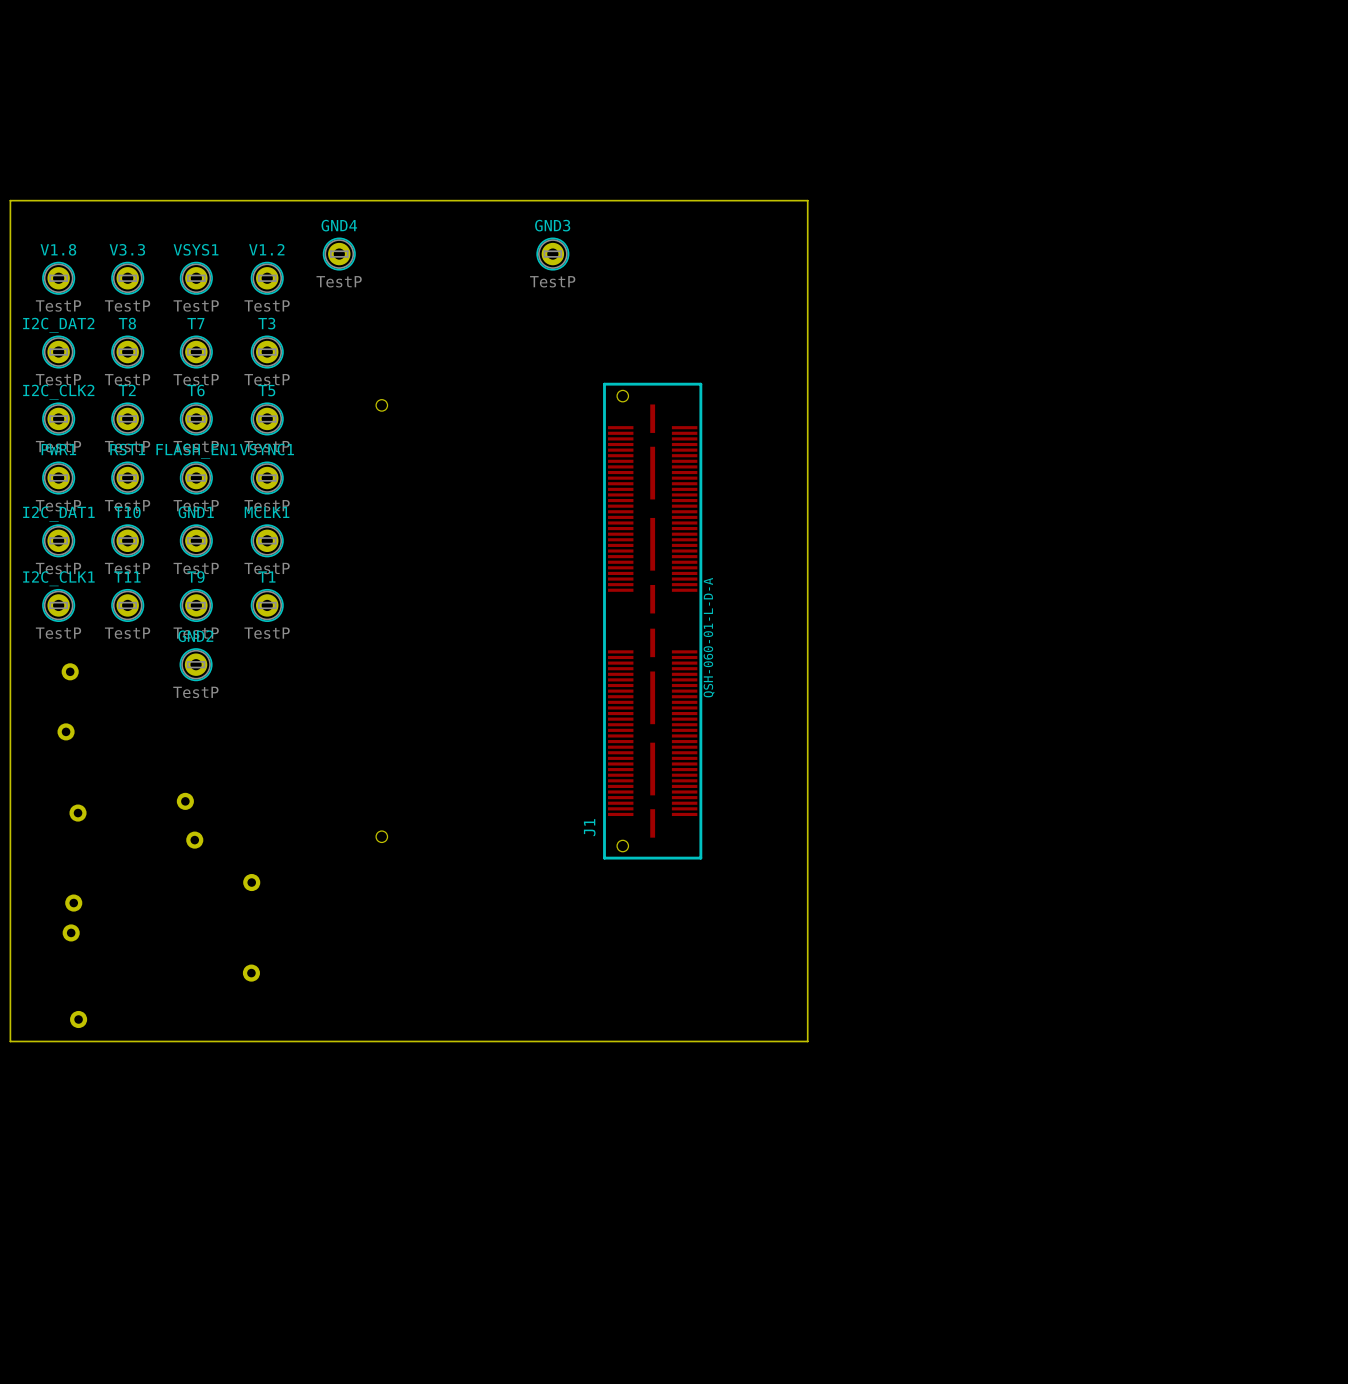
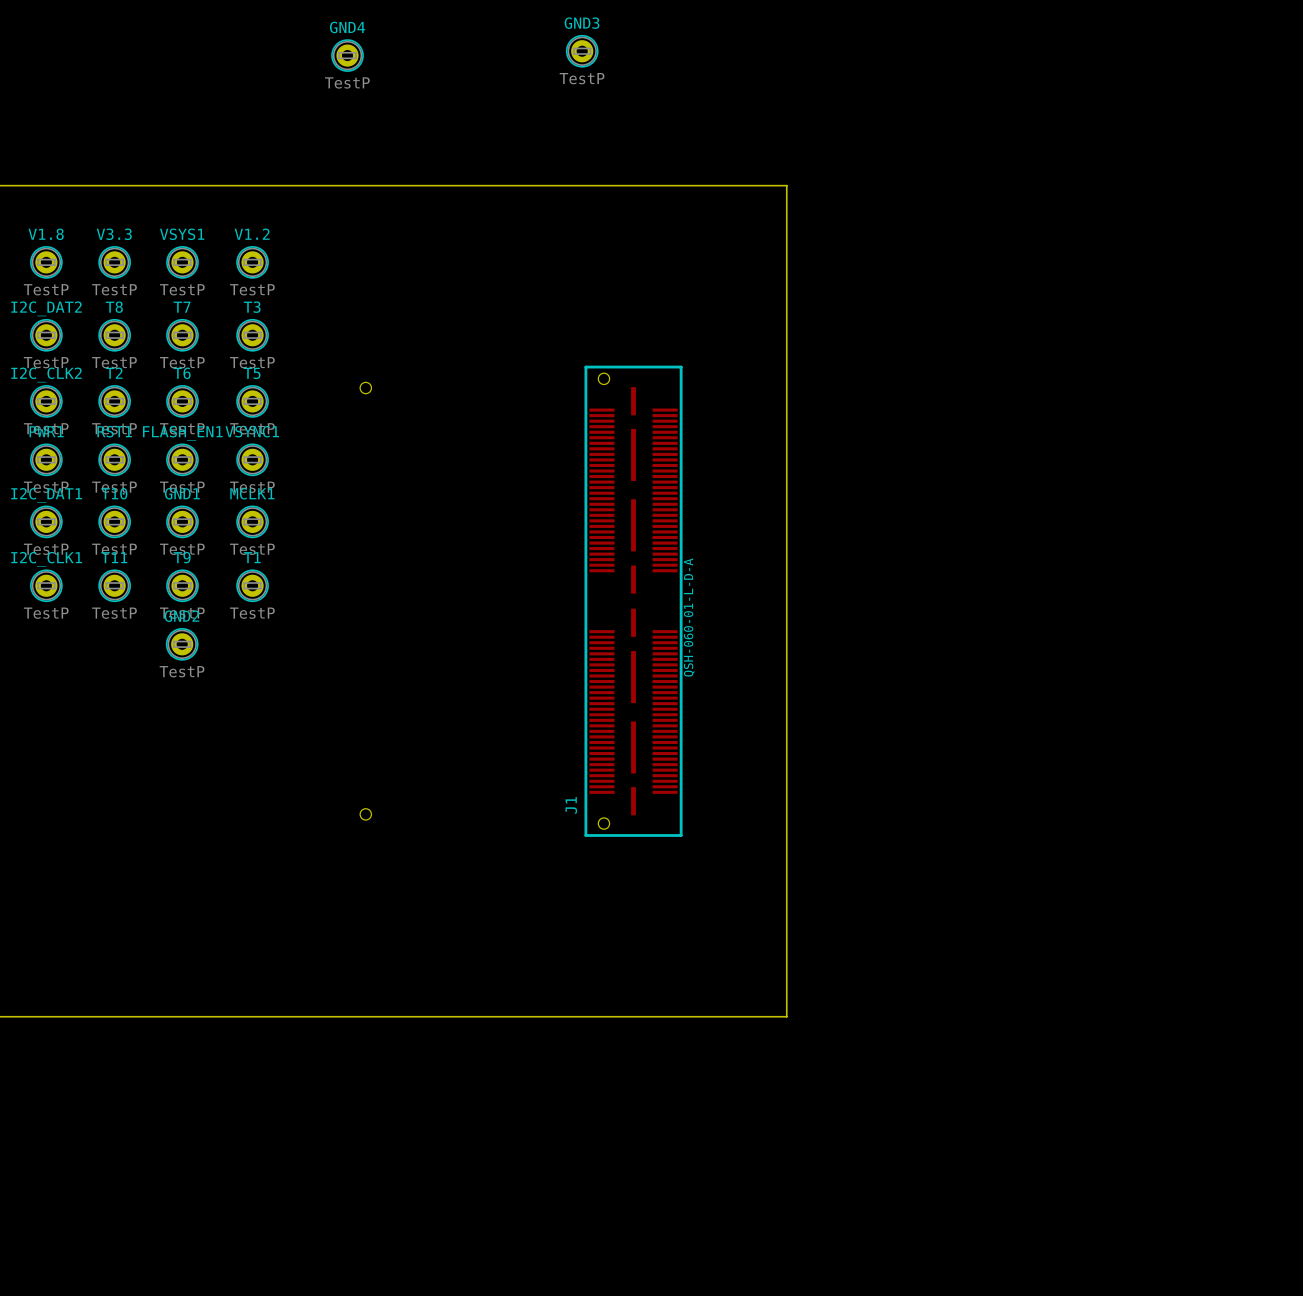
GND4 position: (339, 254) -> (347, 55)
GND3 position: (552, 254) -> (582, 51)
part: (70, 671) -> none
part: (66, 731) -> none
part: (185, 801) -> none
part: (78, 813) -> none
part: (194, 840) -> none
part: (251, 882) -> none
part: (73, 903) -> none
part: (71, 932) -> none
part: (251, 973) -> none
part: (78, 1019) -> none

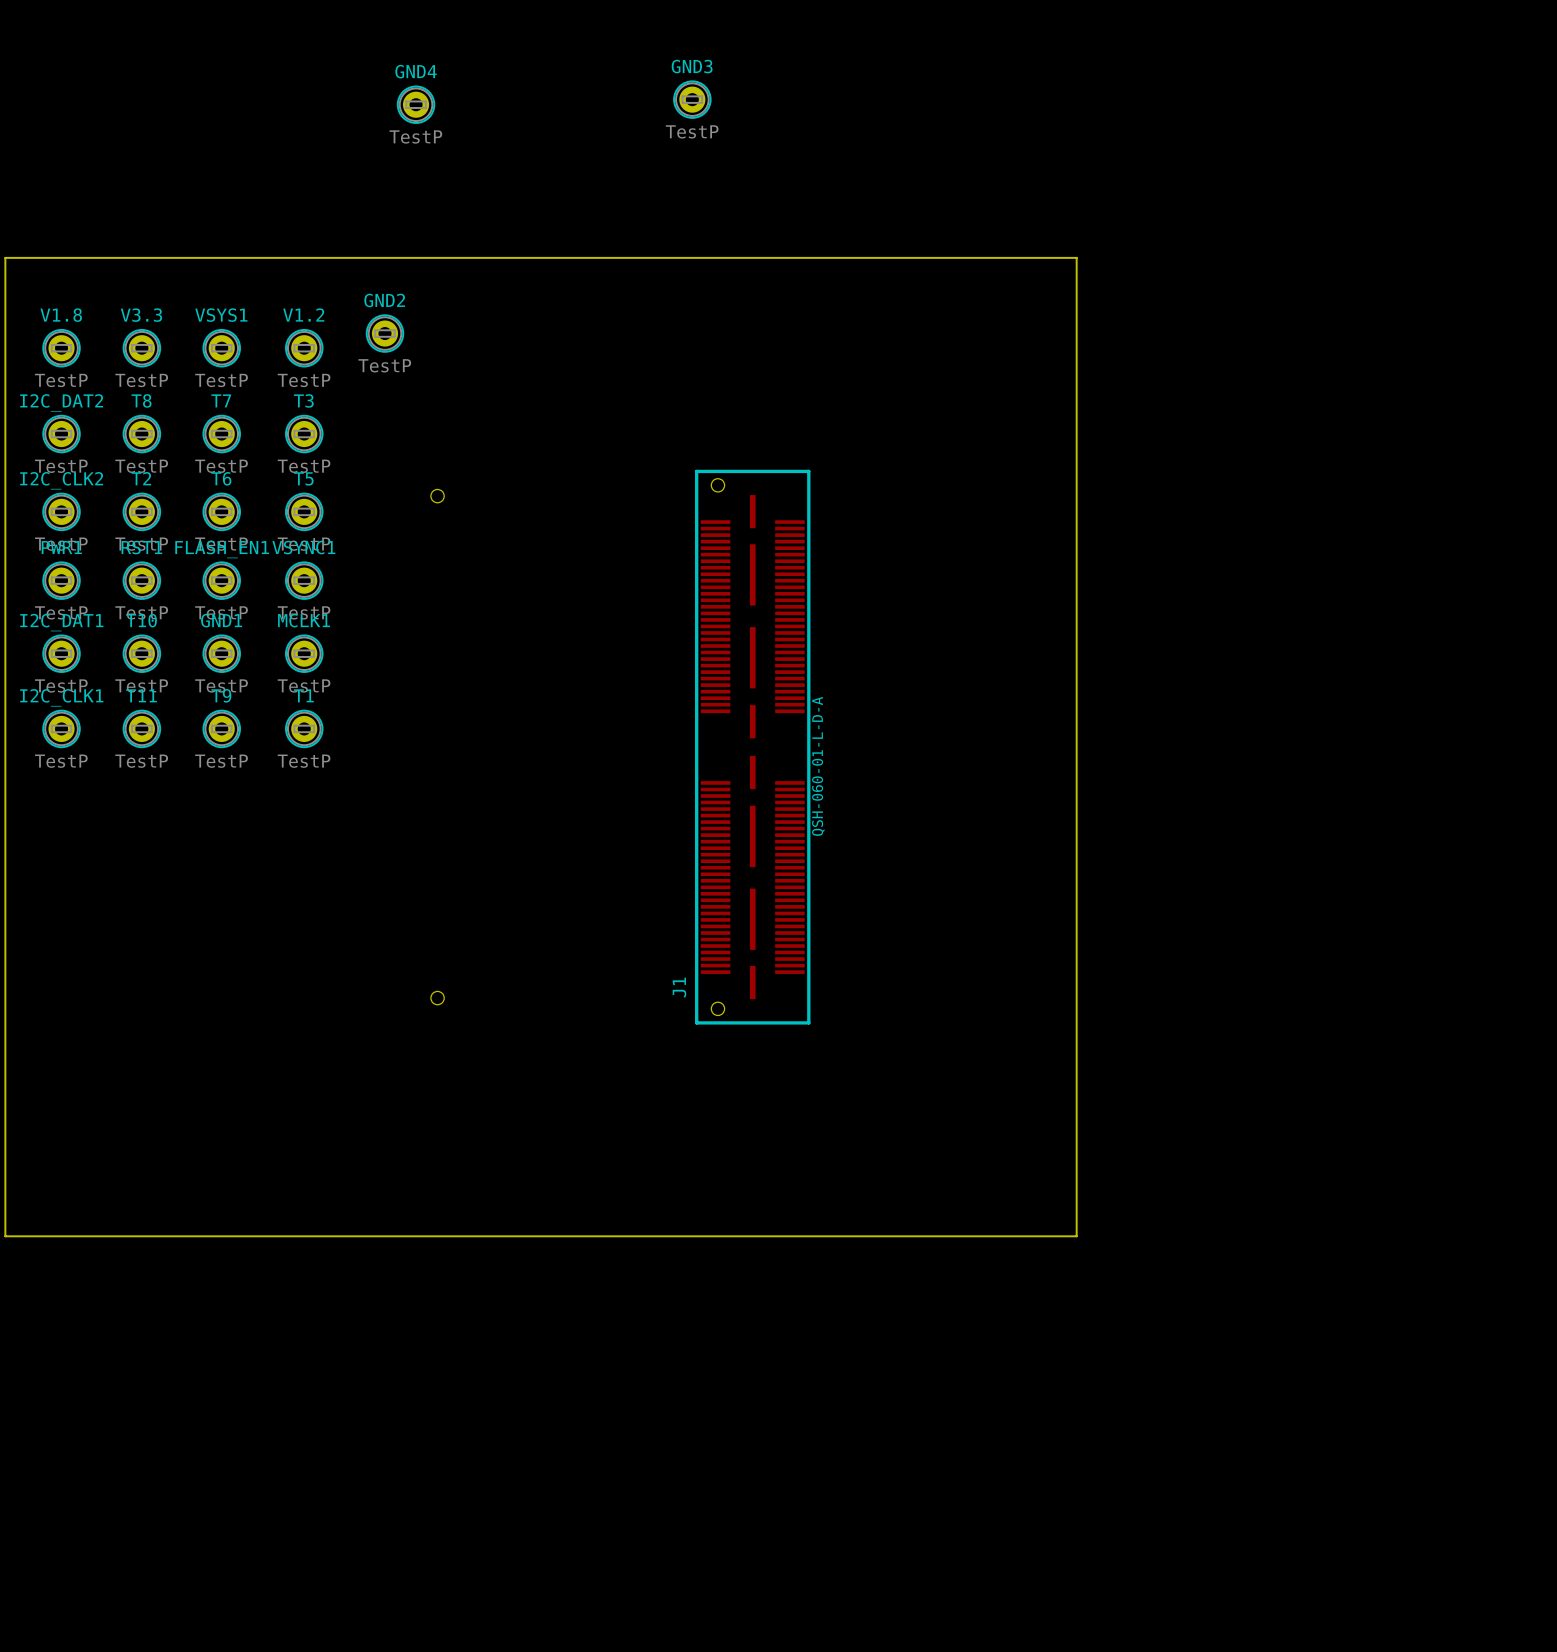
board edge: (786, 185) (786, 1016) -> (933, 257) (1076, 257) (1076, 1236) (933, 1236)
GND2 position: (182, 644) -> (384, 333)

